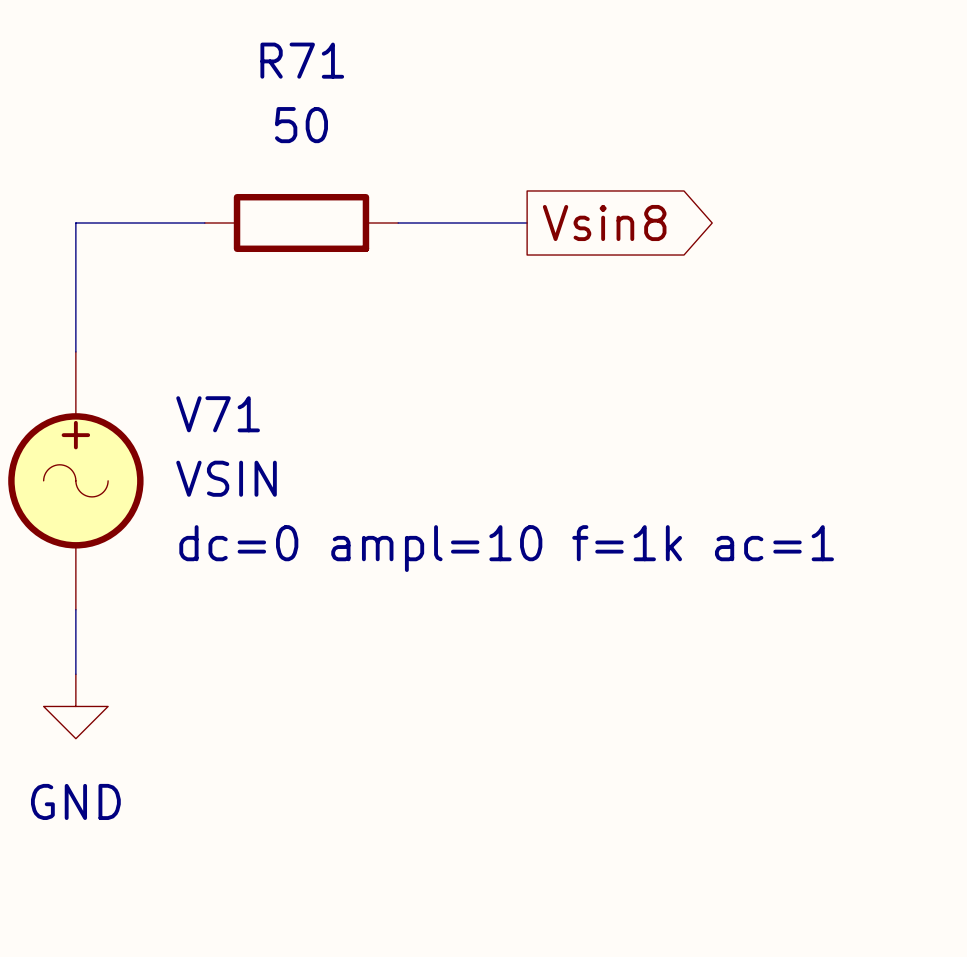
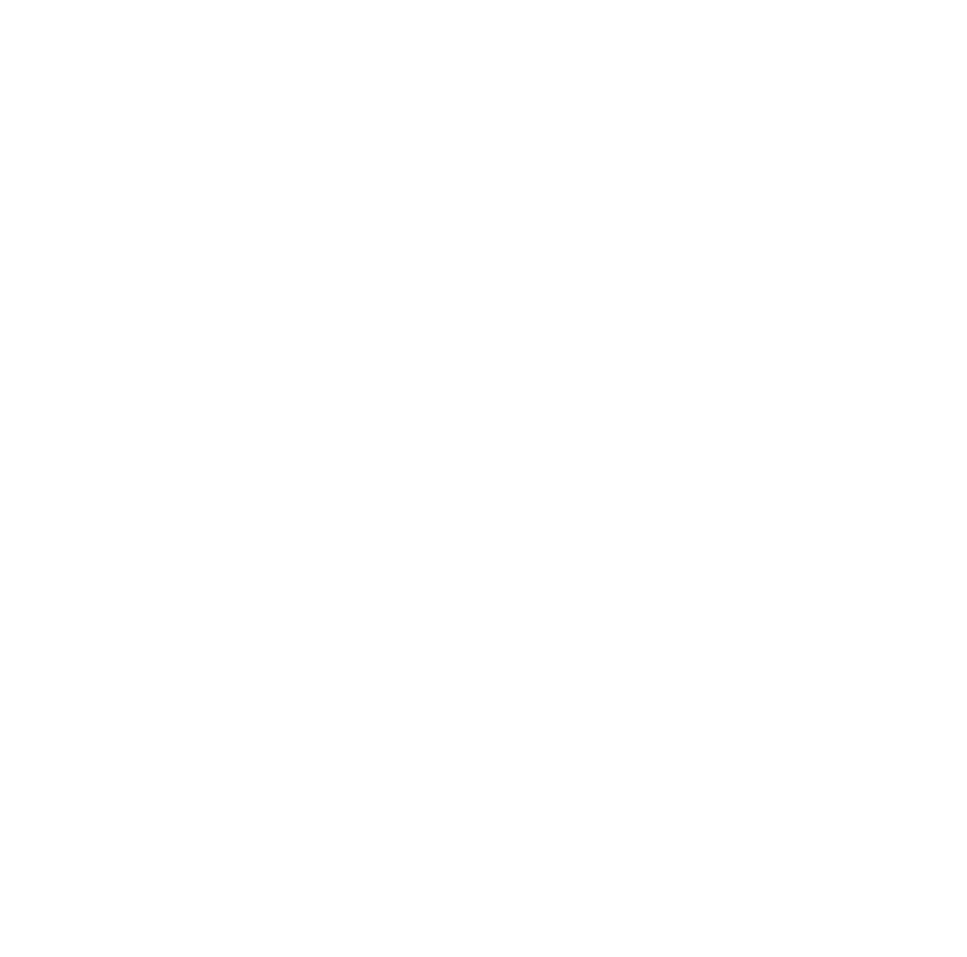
wire: (204, 223) (75, 223) (75, 351) -> none
R71: 50 (301, 223) -> none
wire: (398, 223) (527, 223) -> none
global label: Vsin8 (604, 223) -> none
V71: VSIN (75, 480) -> none
wire: (75, 609) (75, 674) -> none
power symbol: GND (75, 706) -> none

